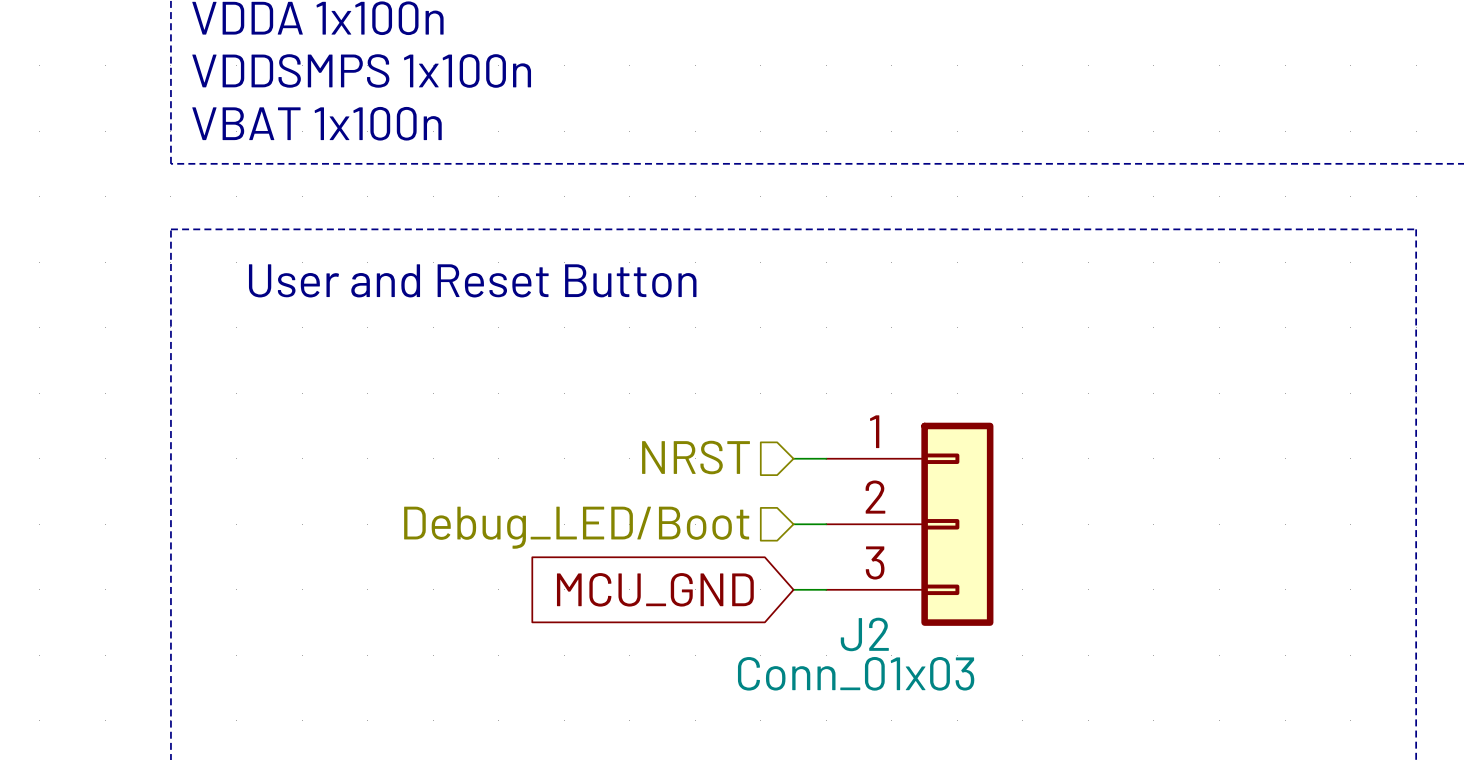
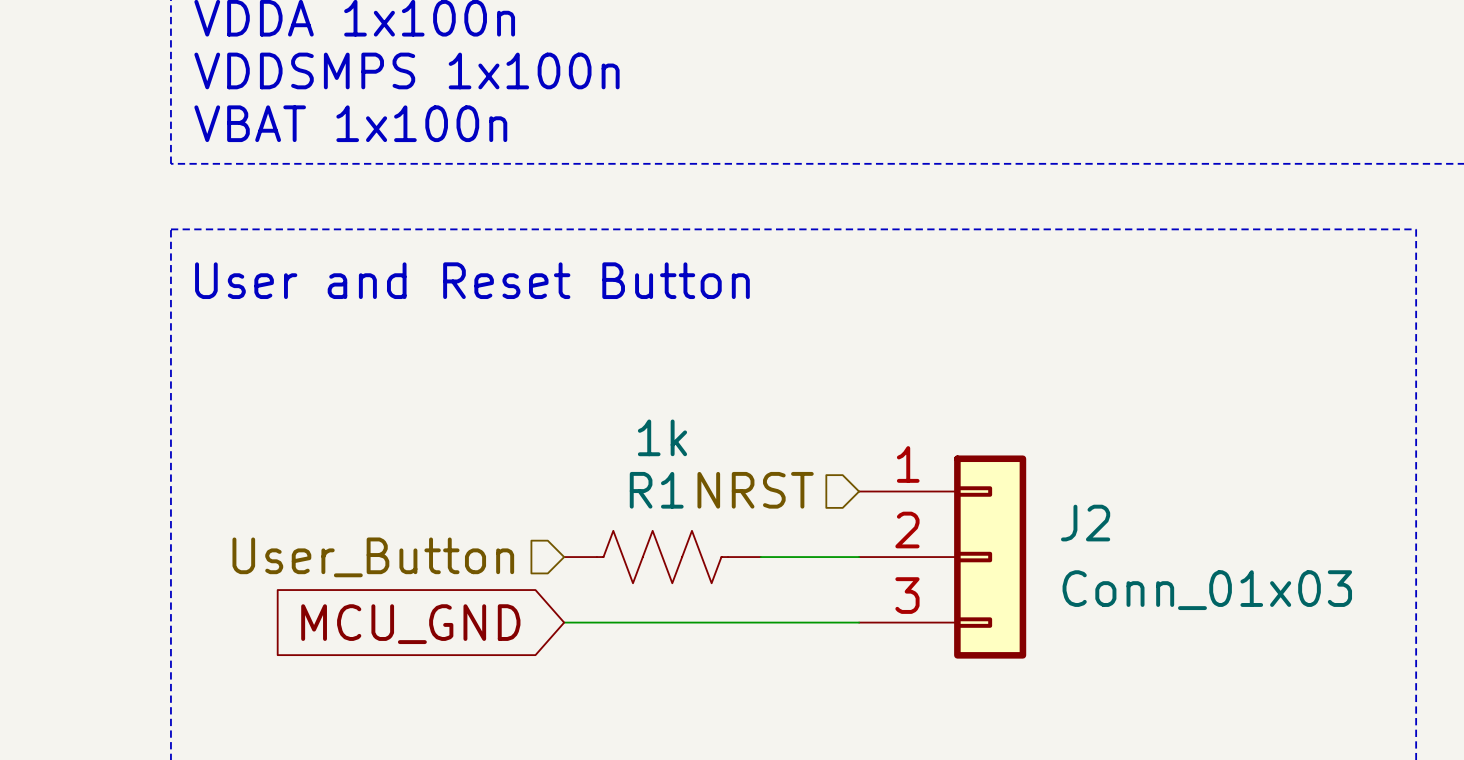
hierarchical label position: NRST (696, 457) -> NRST (755, 490)
wire: (793, 458) (826, 458) -> none
wire: (793, 524) (826, 524) -> none
J2 position: (909, 524) -> (942, 557)
hierarchical label: Debug_LED/Boot (576, 527) -> none
hierarchical label: none -> User_Button (373, 557)
R1: none -> 1k (662, 557)
wire: none -> (760, 557) (859, 557)
global label position: MCU_GND (655, 589) -> MCU_GND (410, 624)
wire: (793, 589) (826, 589) -> none
wire: none -> (564, 622) (859, 622)
J2 name position: J2 (864, 634) -> J2 (1085, 523)
J2 value position: Conn_01x03 (856, 673) -> Conn_01x03 (1207, 590)

